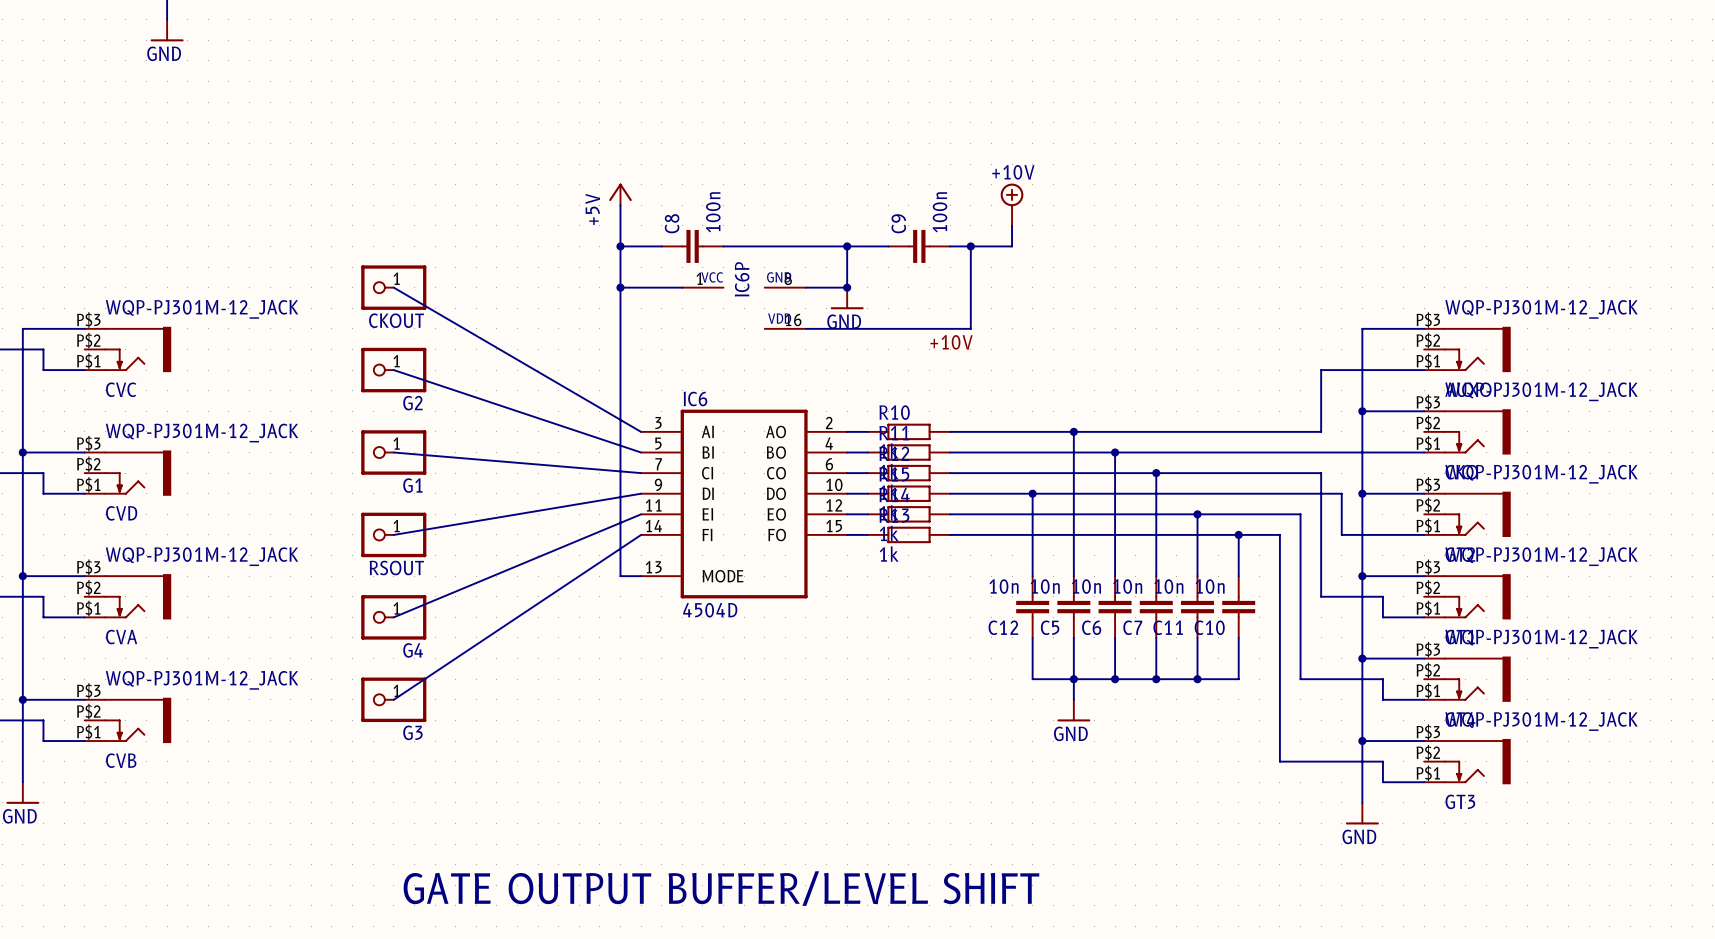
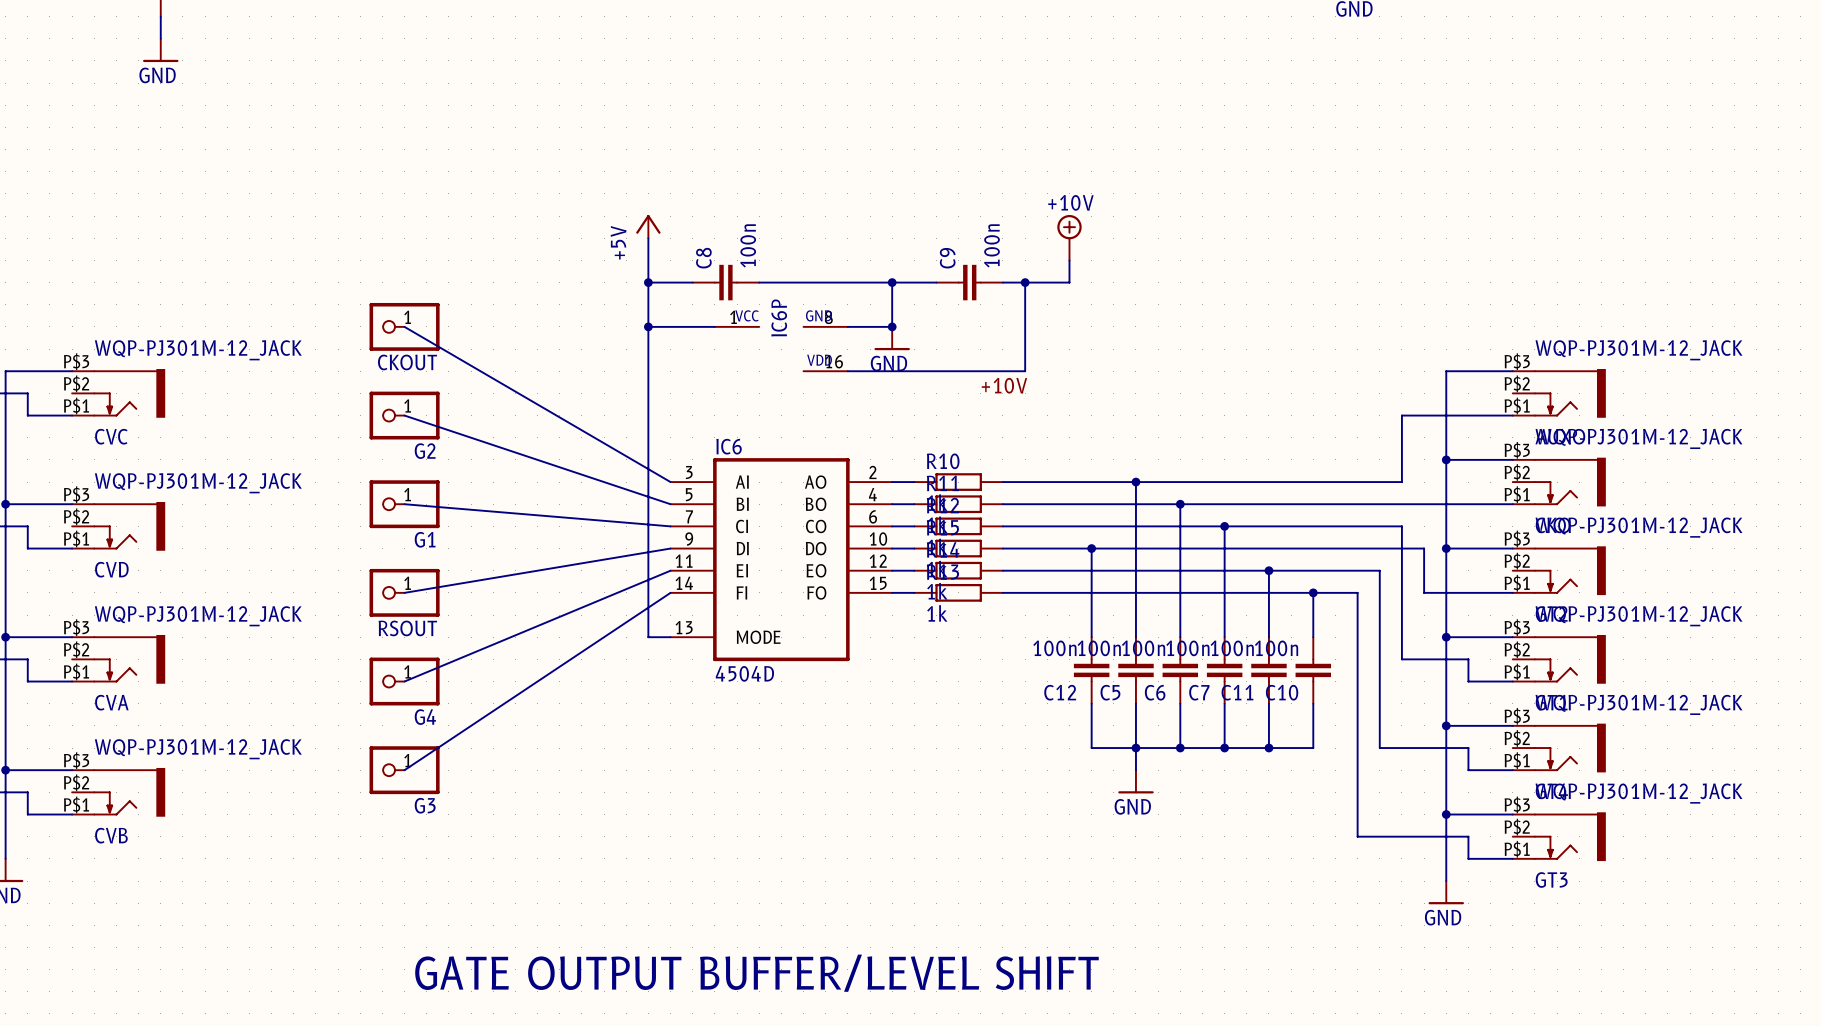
C12 value: 10n (1004, 586) -> 100n (1054, 648)
C5 value: 10n (1045, 586) -> 100n (1099, 648)
C6 value: 10n (1086, 586) -> 100n (1143, 648)
C7 value: 10n (1127, 586) -> 100n (1187, 648)
C11 value: 10n (1168, 586) -> 100n (1232, 648)
C10 value: 10n (1210, 586) -> 100n (1276, 648)

